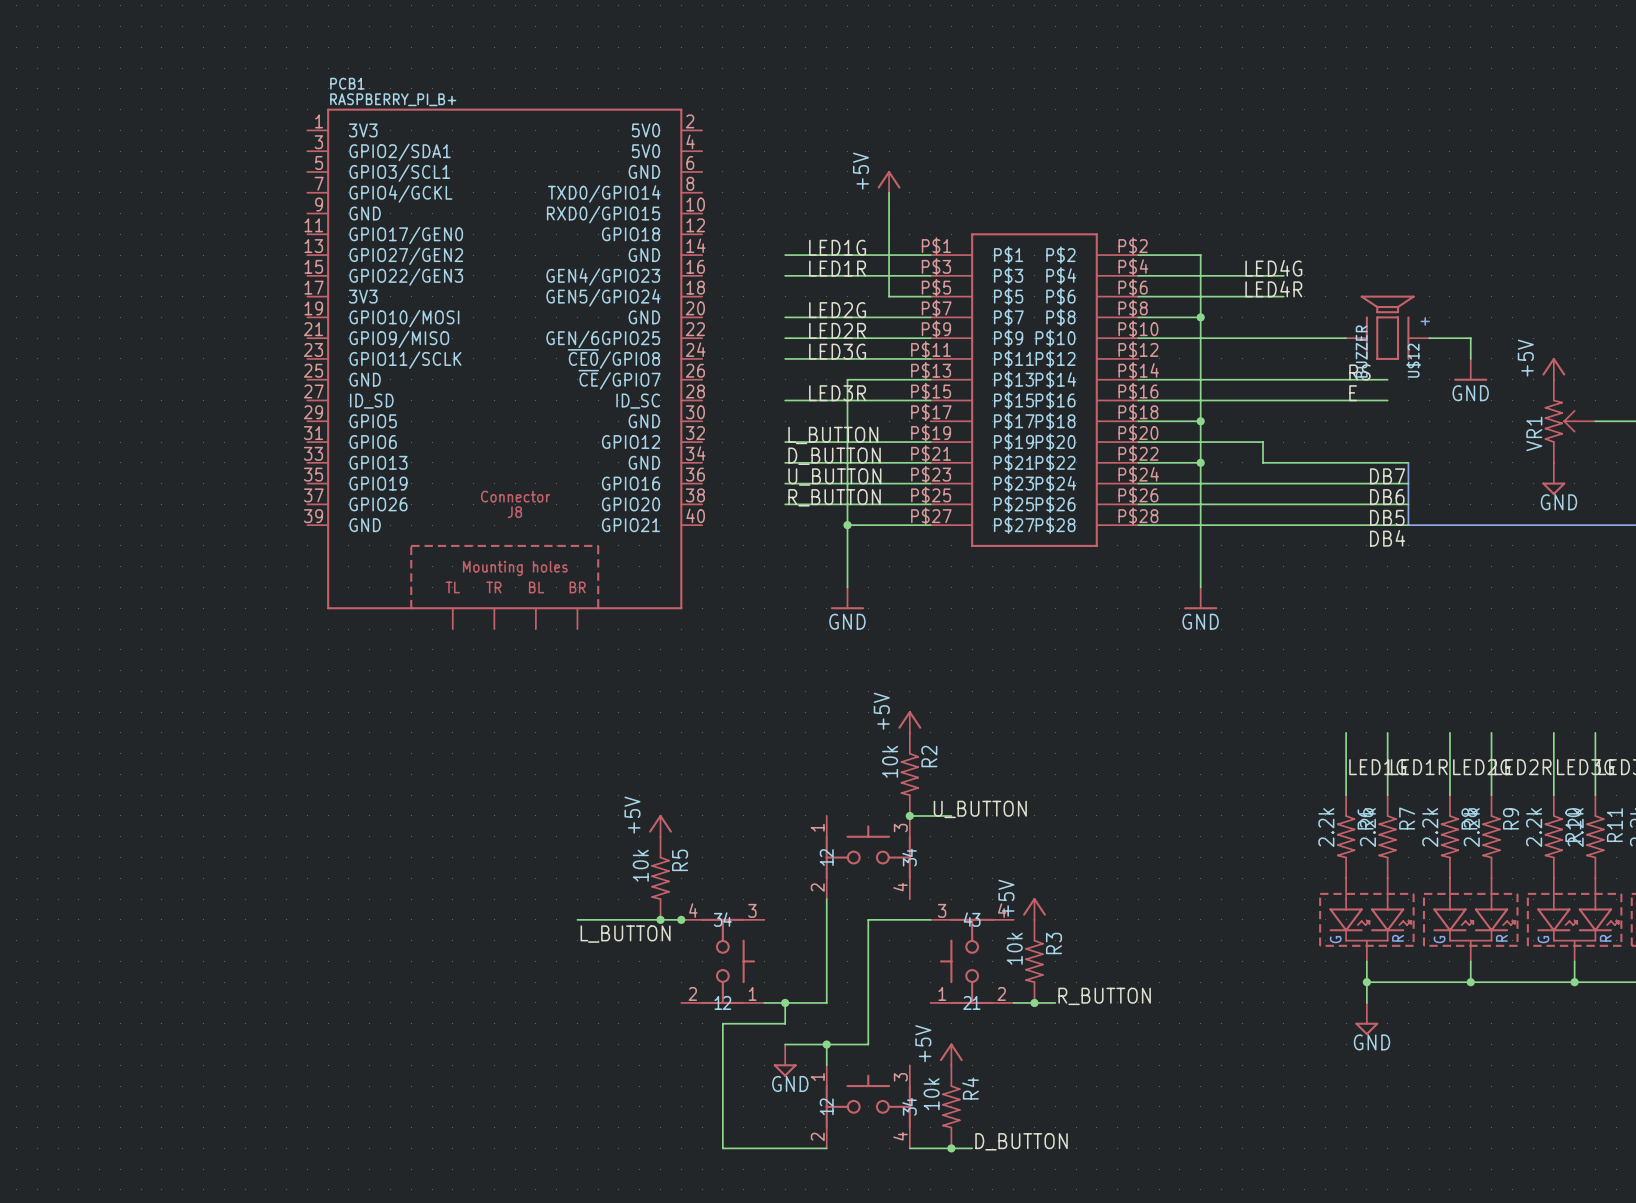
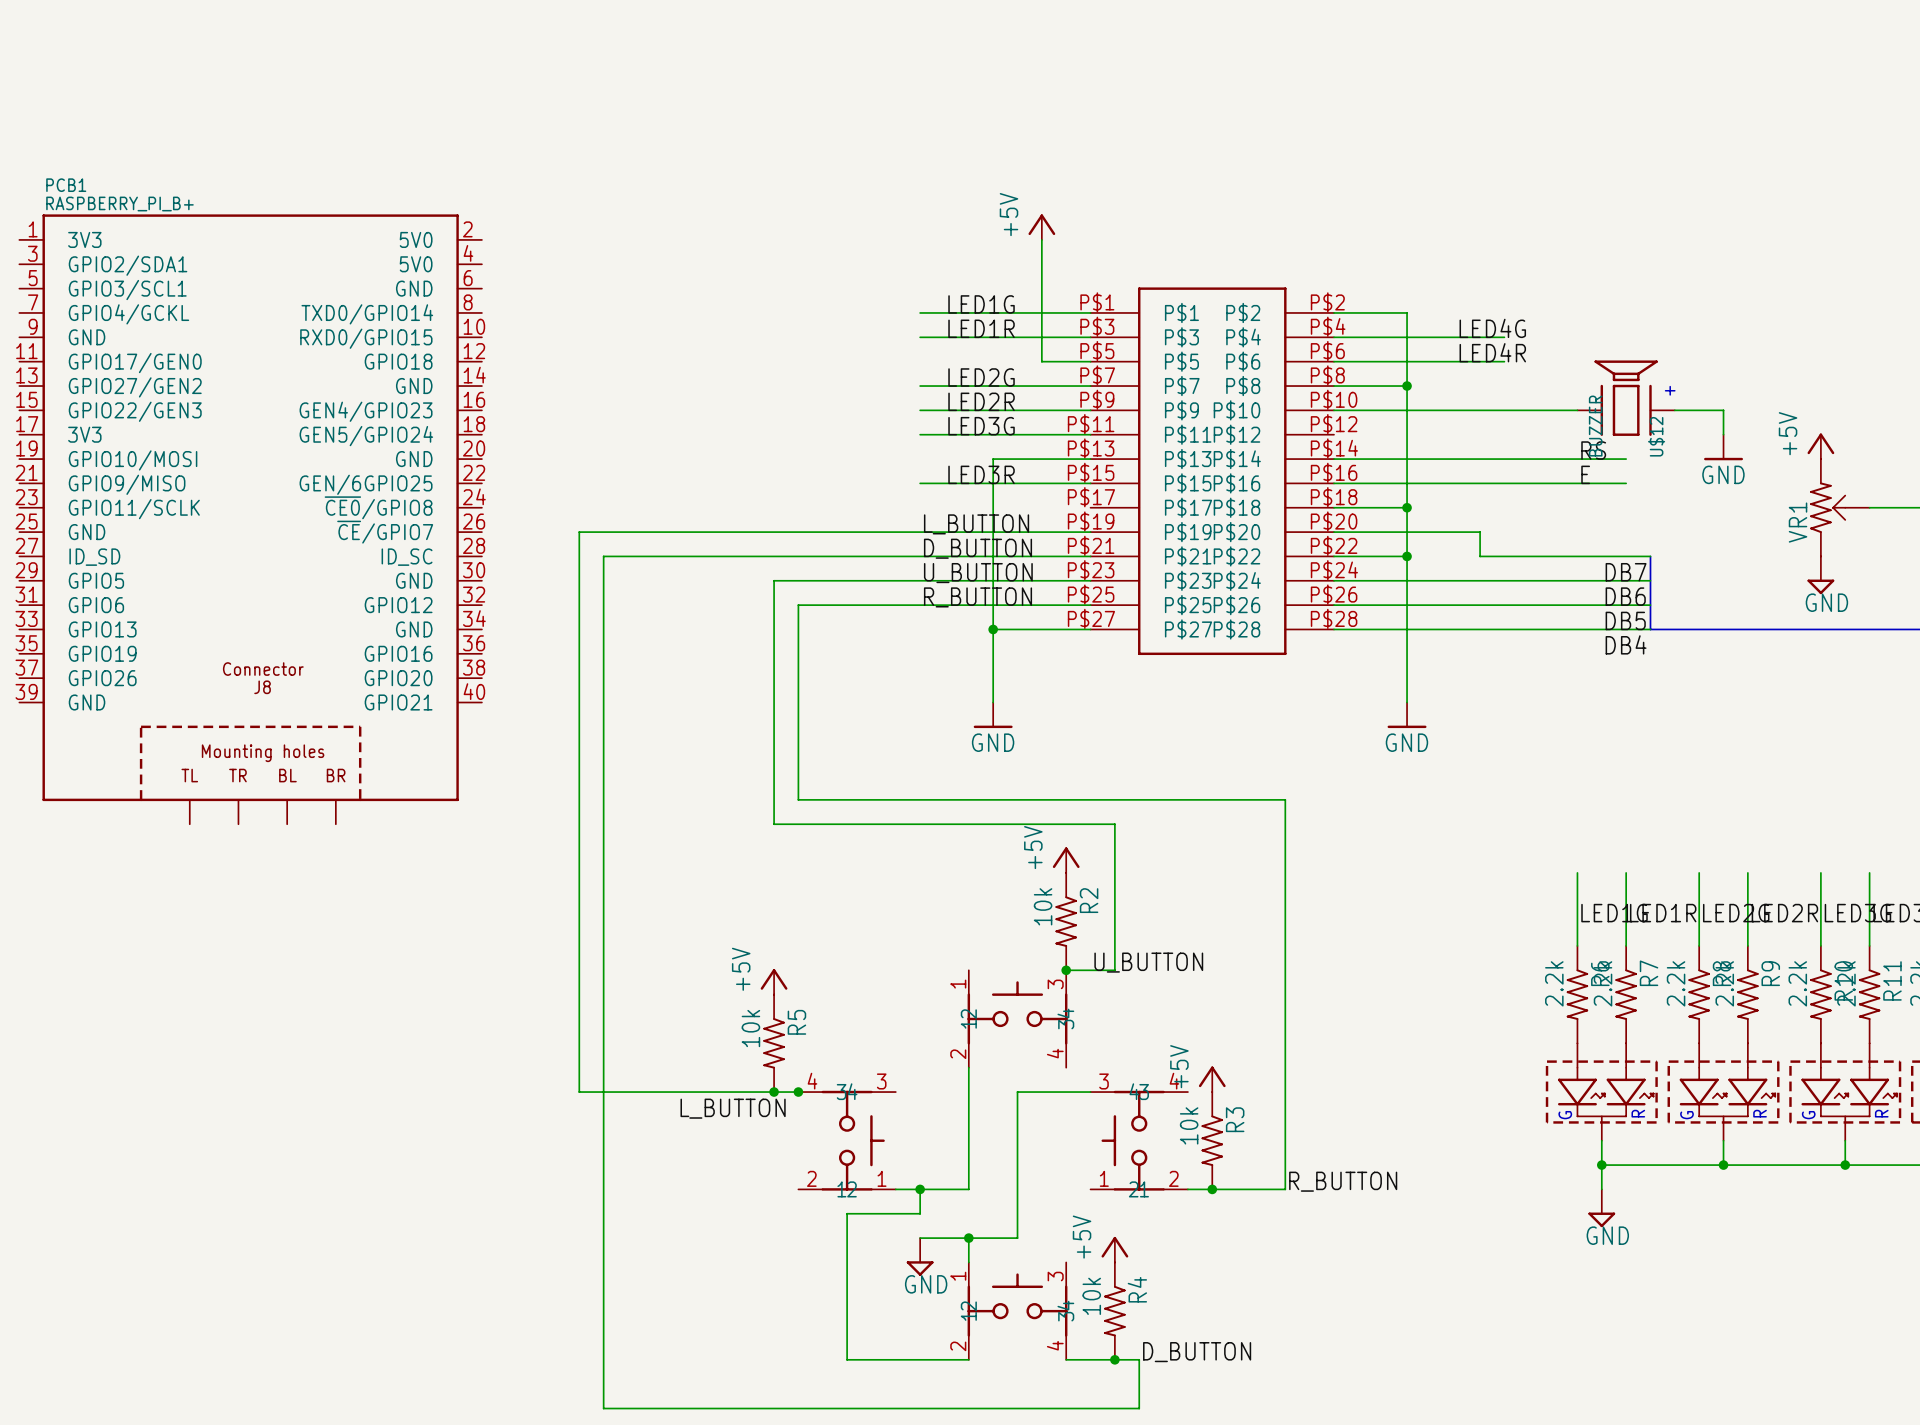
PCB1 position: (504, 368) -> (250, 519)
wire: none -> (920, 532) (579, 532) (579, 1092) (676, 1092)
wire: none -> (920, 556) (603, 556) (603, 1408) (1139, 1408) (1139, 1359)
wire: none -> (920, 580) (774, 580) (774, 824) (1114, 824) (1114, 970)
wire: none -> (920, 605) (798, 605) (798, 799) (1285, 799) (1285, 1189) (1236, 1189)
label position: R_BUTTON (1104, 996) -> R_BUTTON (1343, 1181)

